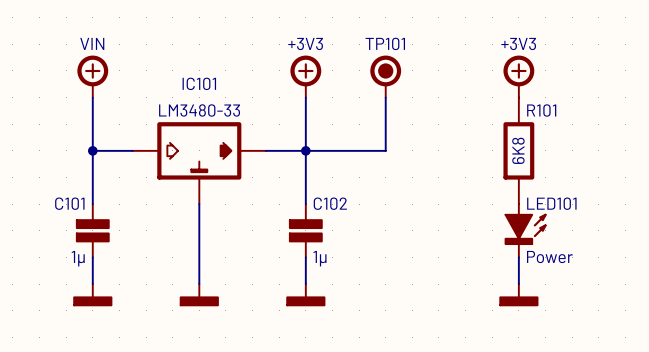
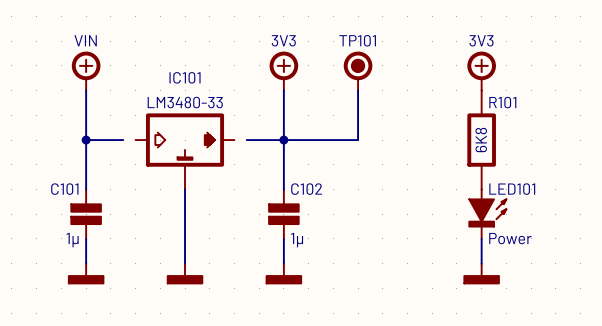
power symbol text: +3V3 (305, 43) -> 3V3 (283, 40)
power symbol text: +3V3 (518, 43) -> 3V3 (481, 40)
IC101 symbol: [132, 122, 266, 205] -> [135, 113, 235, 190]

